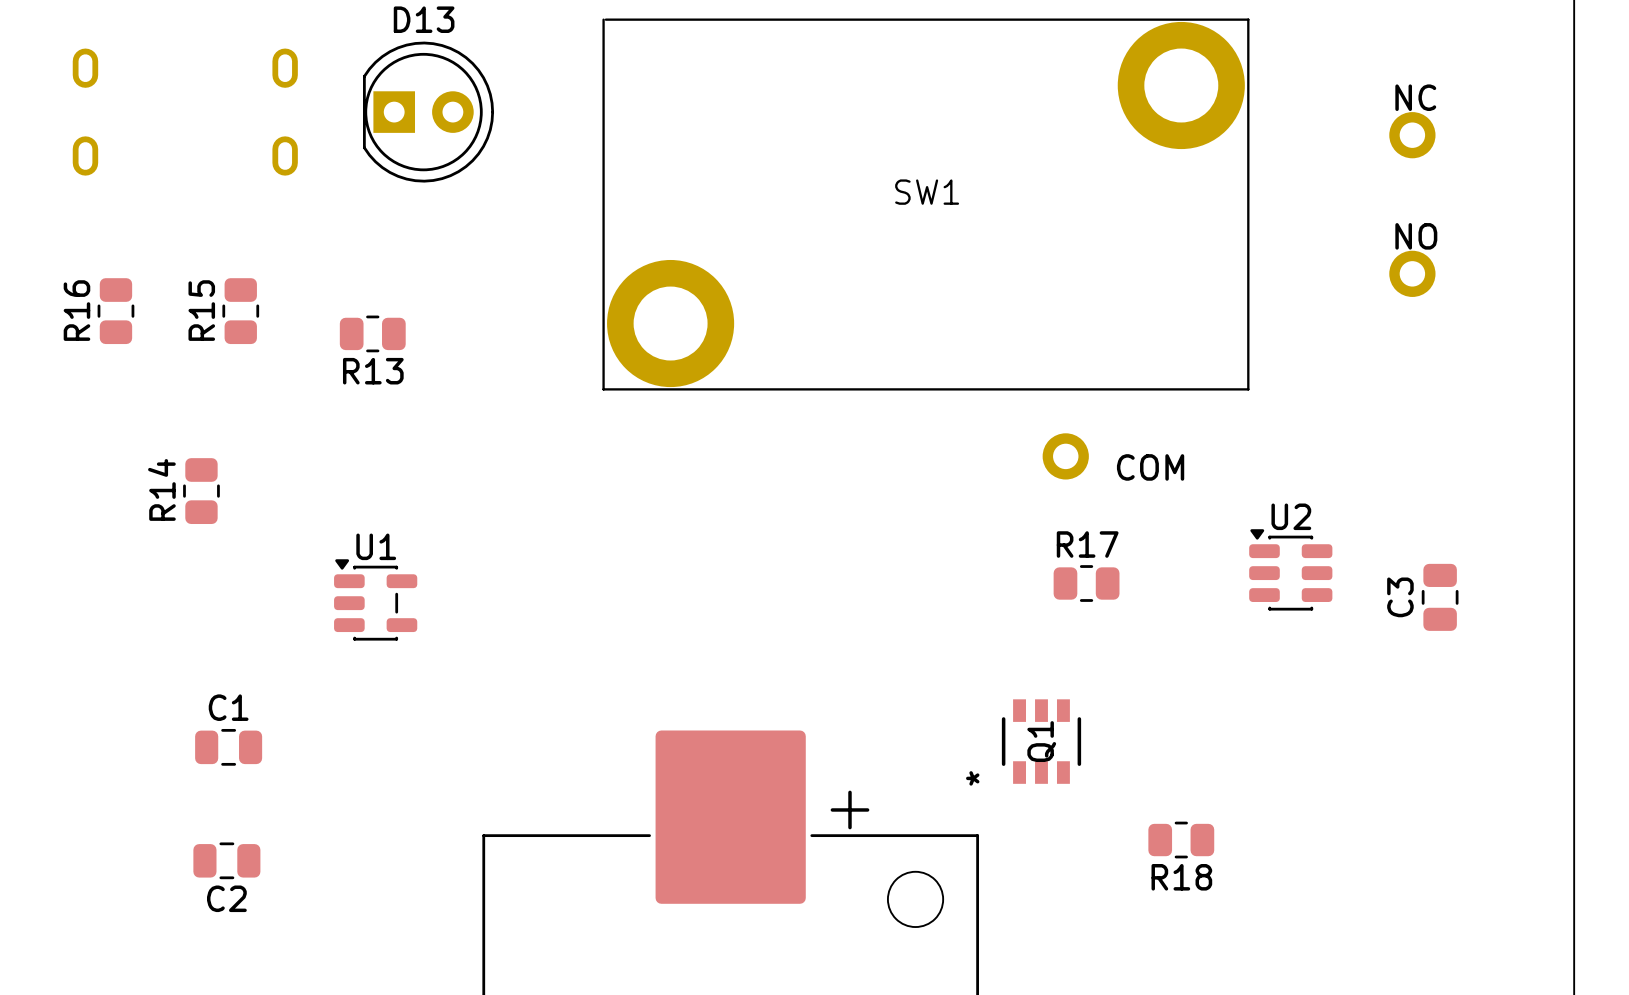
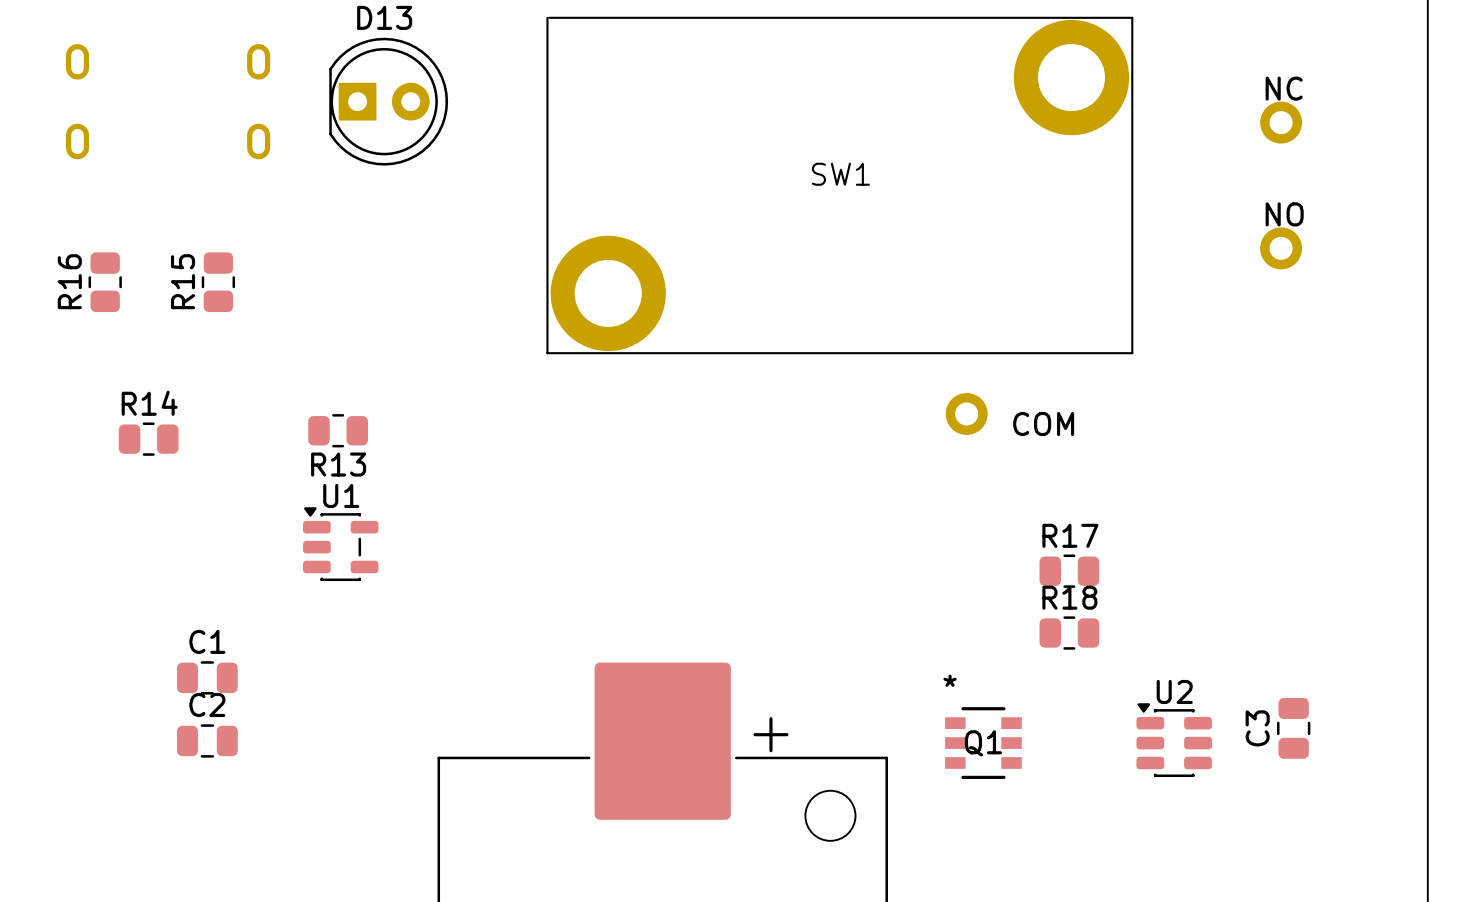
R13 position: (372, 333) -> (338, 430)
R14 rotation: 0° (201, 491) -> 90° clockwise (148, 439)
U2 position: (1290, 569) -> (1174, 740)
R17 position: (1086, 583) -> (1069, 571)
C3 position: (1440, 597) -> (1293, 728)
Q1 rotation: 0° (1041, 741) -> 90° clockwise (983, 743)
Q1 position: (1041, 741) -> (983, 743)
R18 position: (1181, 840) -> (1069, 633)
C2 position: (226, 860) -> (207, 740)
R18 name position: R18 (1181, 877) -> R18 (1069, 597)
C2 name position: C2 (226, 898) -> C2 (207, 704)

